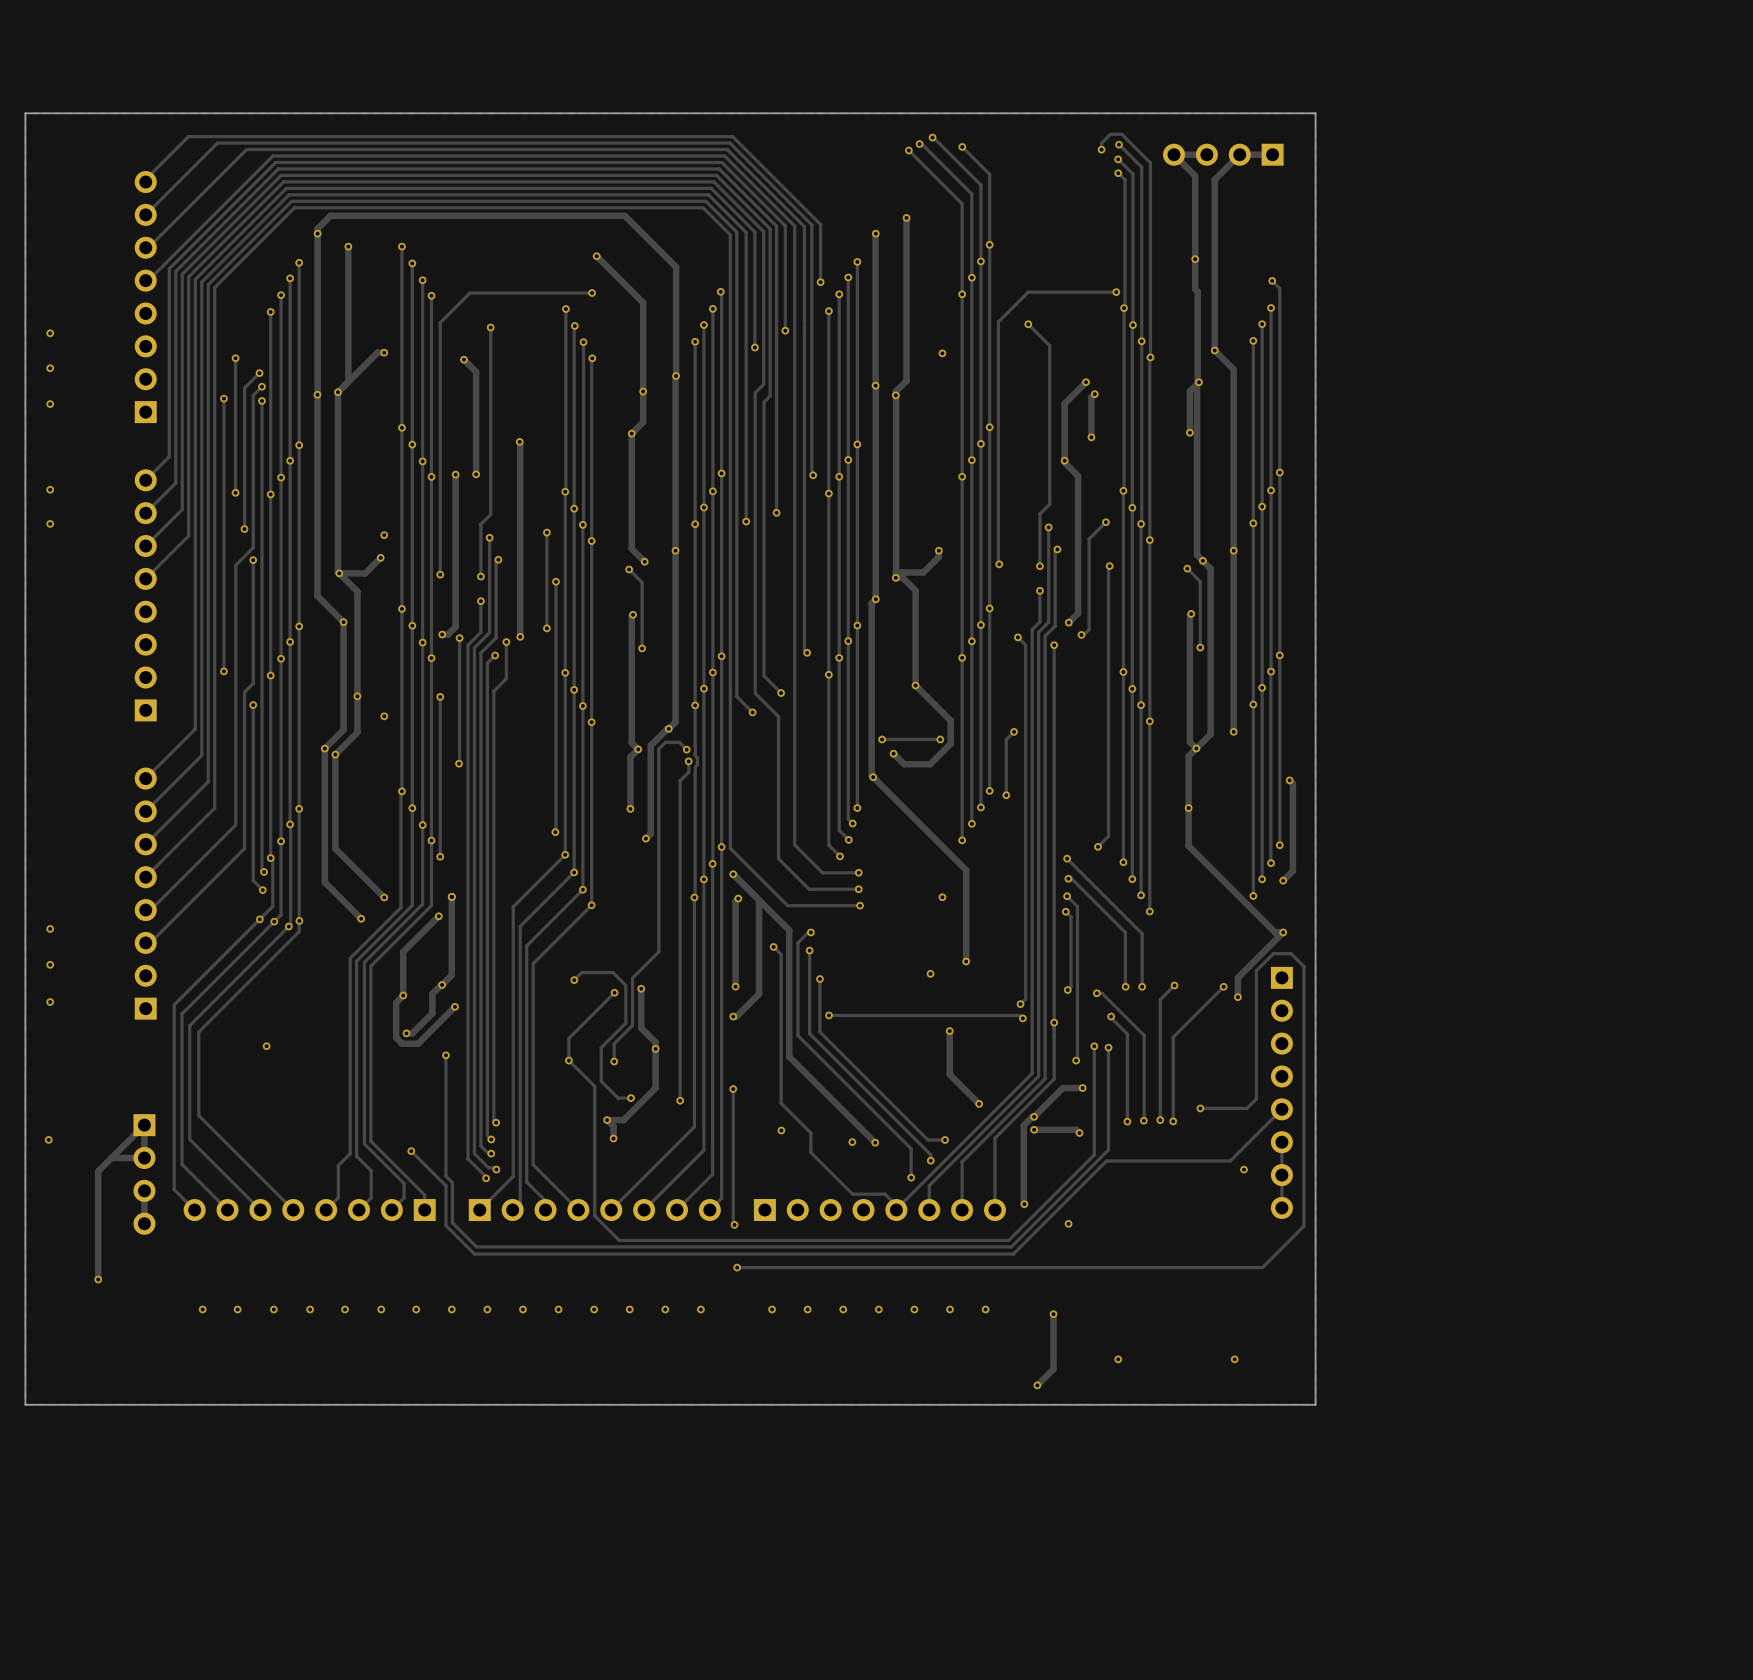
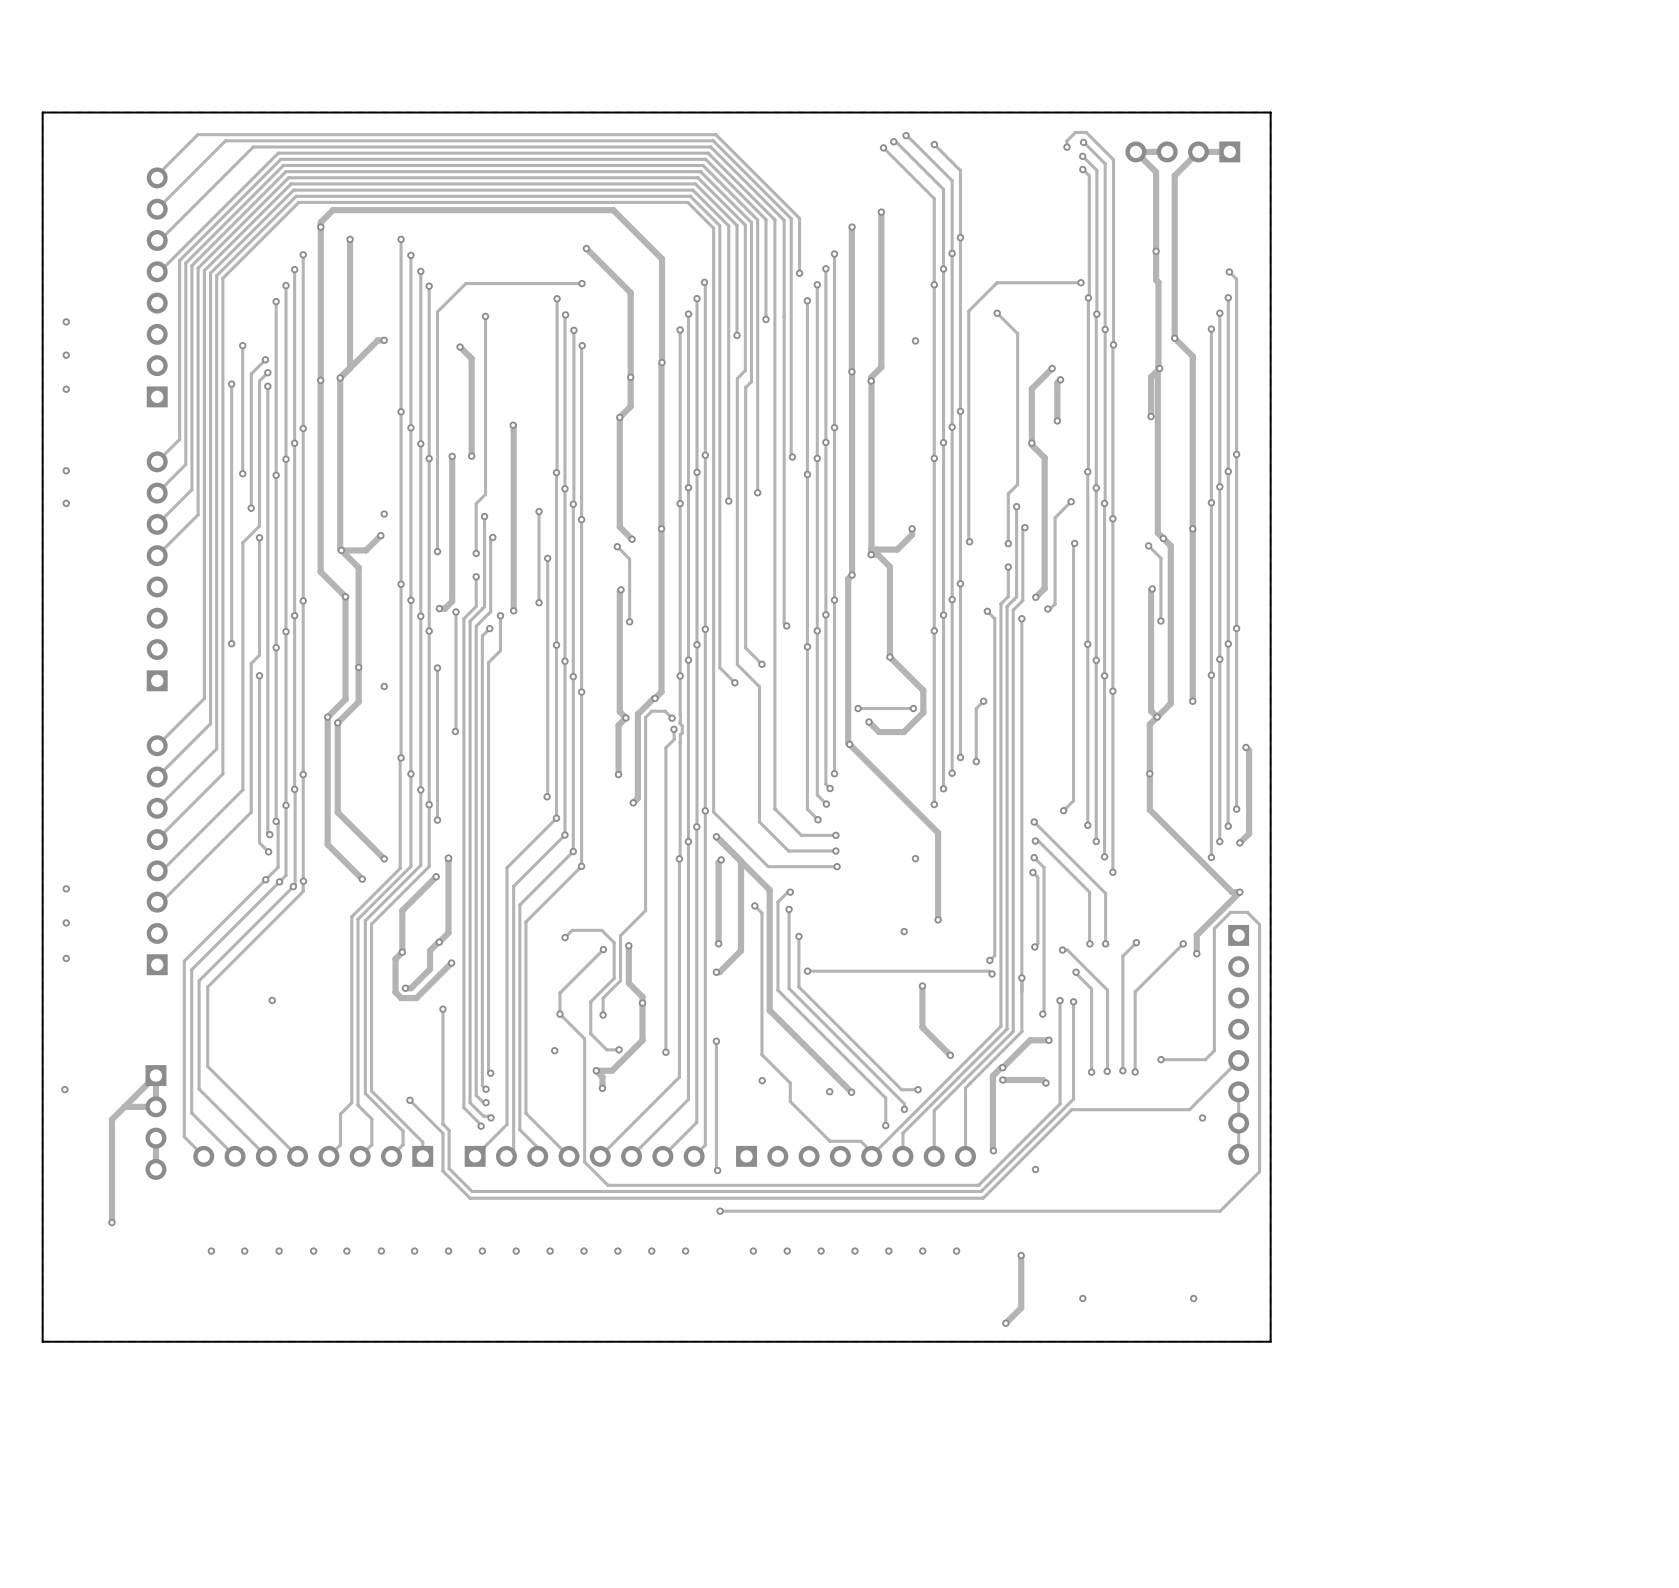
via: none -> (554, 1050)

